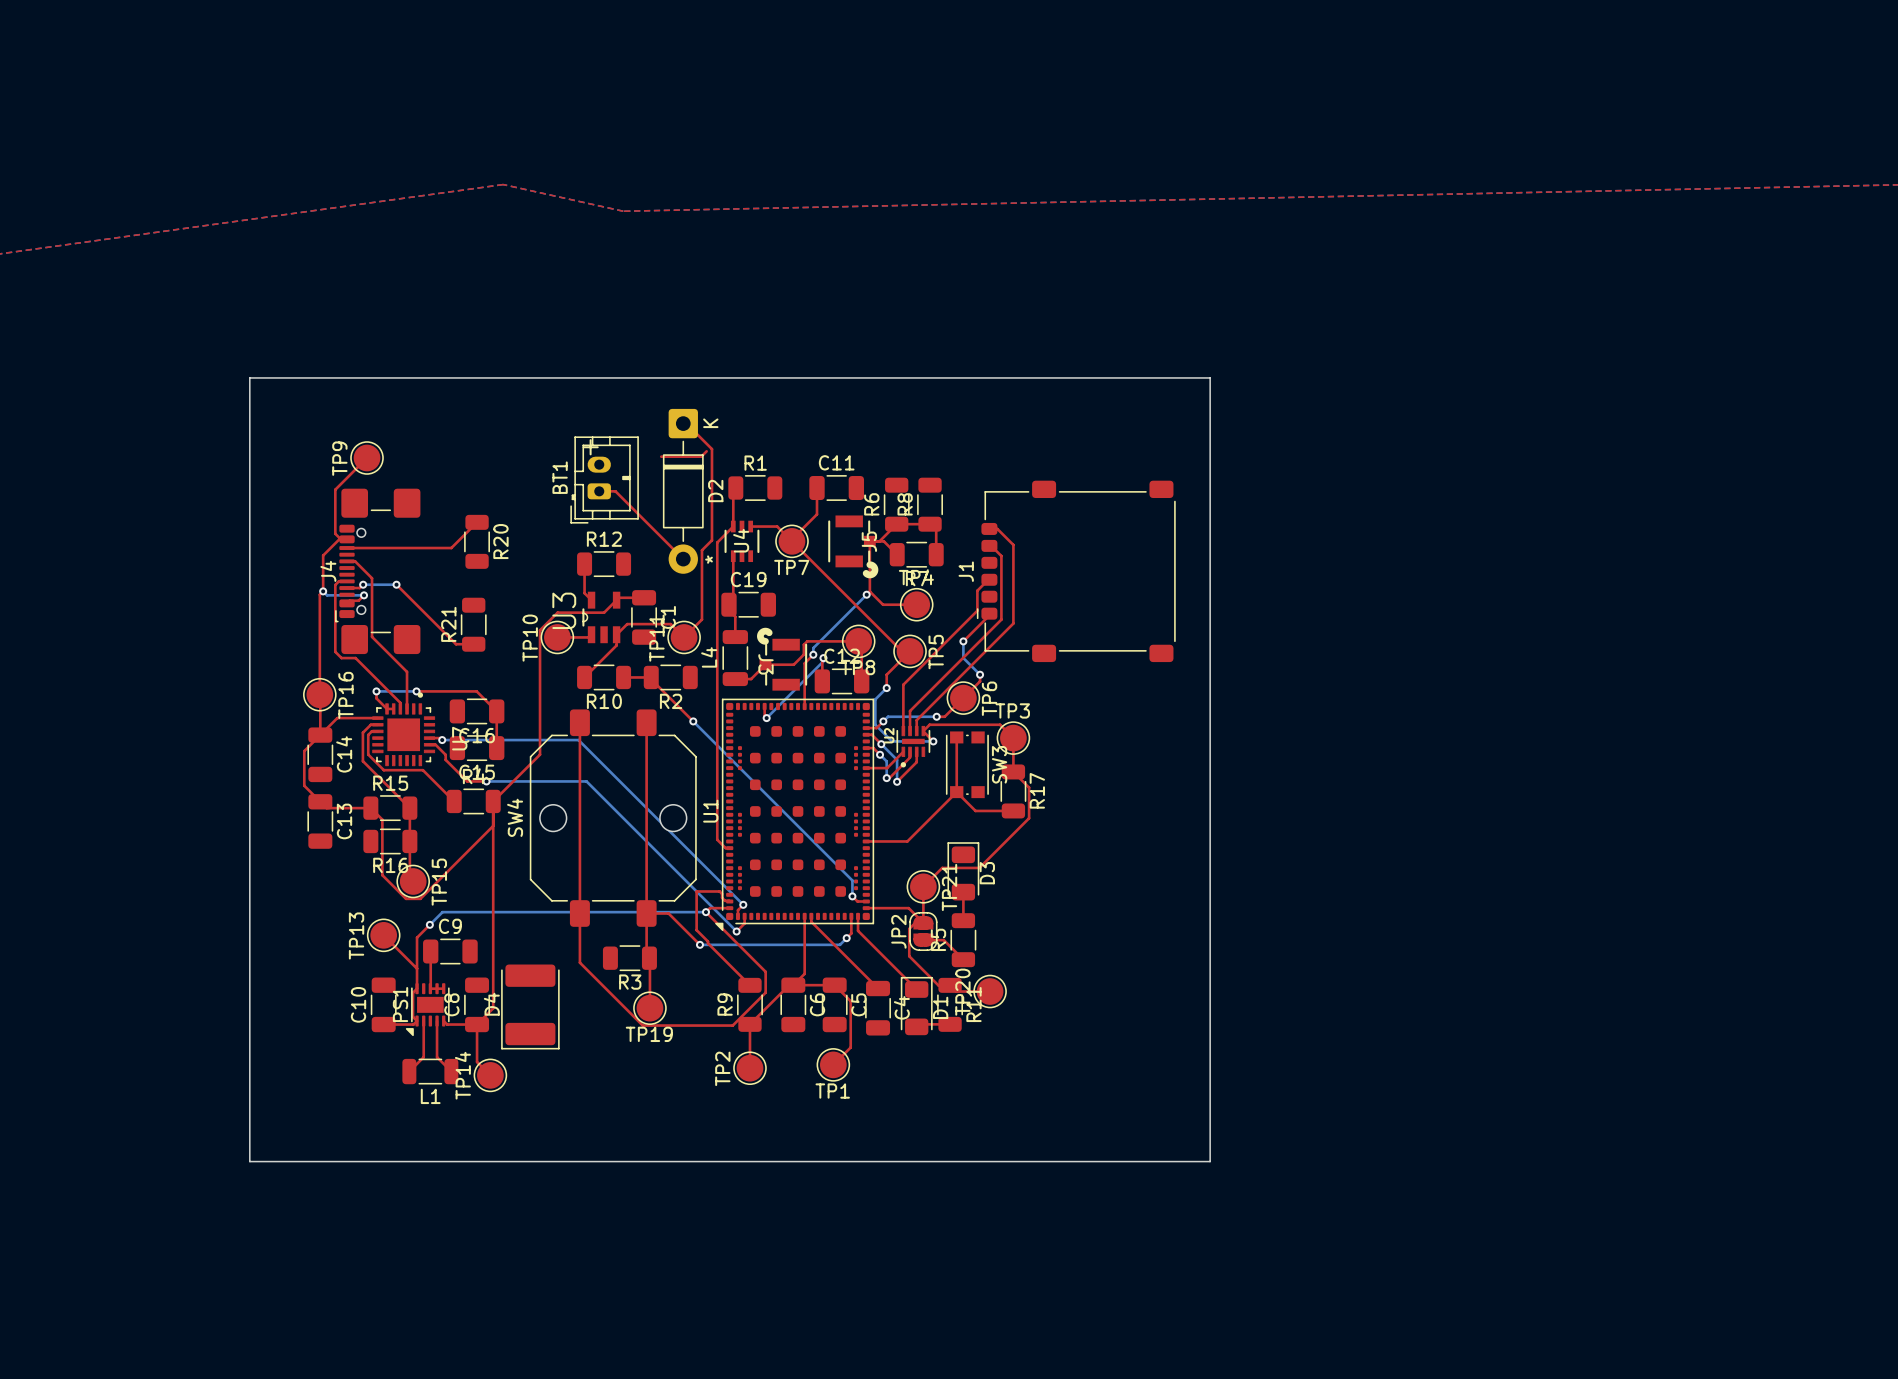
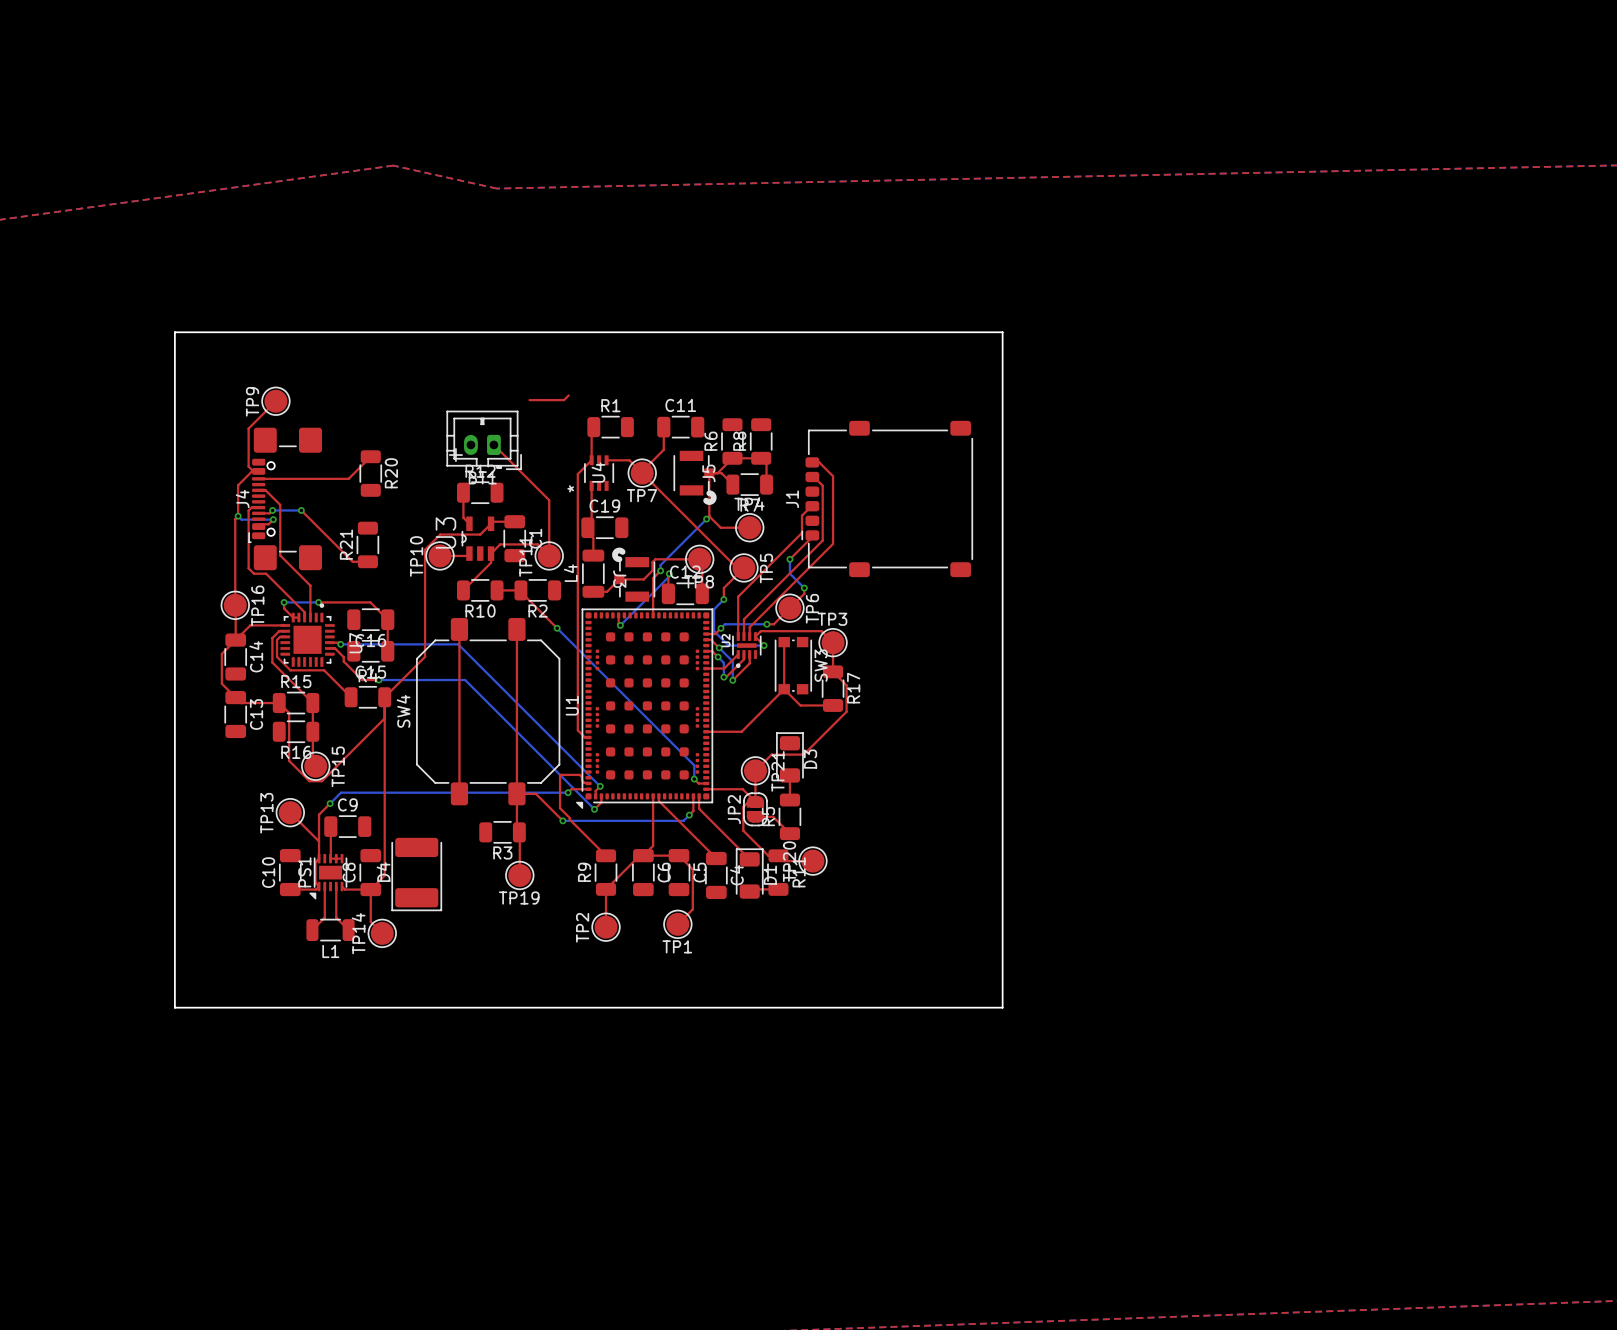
top track: (683, 423) (686, 423) (711, 449) (711, 540) (701, 550) (701, 619) (684, 637) -> (493, 444) (549, 500) (549, 555)
BT1 rotation: 0° (604, 480) -> 90° counterclockwise (484, 440)
top track: (599, 491) (615, 491) (683, 559) -> none
D2: (683, 491) -> none
SW4 footprint: [529, 709, 697, 927] -> [416, 617, 561, 806]
top track: (705, 912) (765, 971) (765, 992) (732, 1025) (642, 1025) (579, 962) (579, 913) -> none

